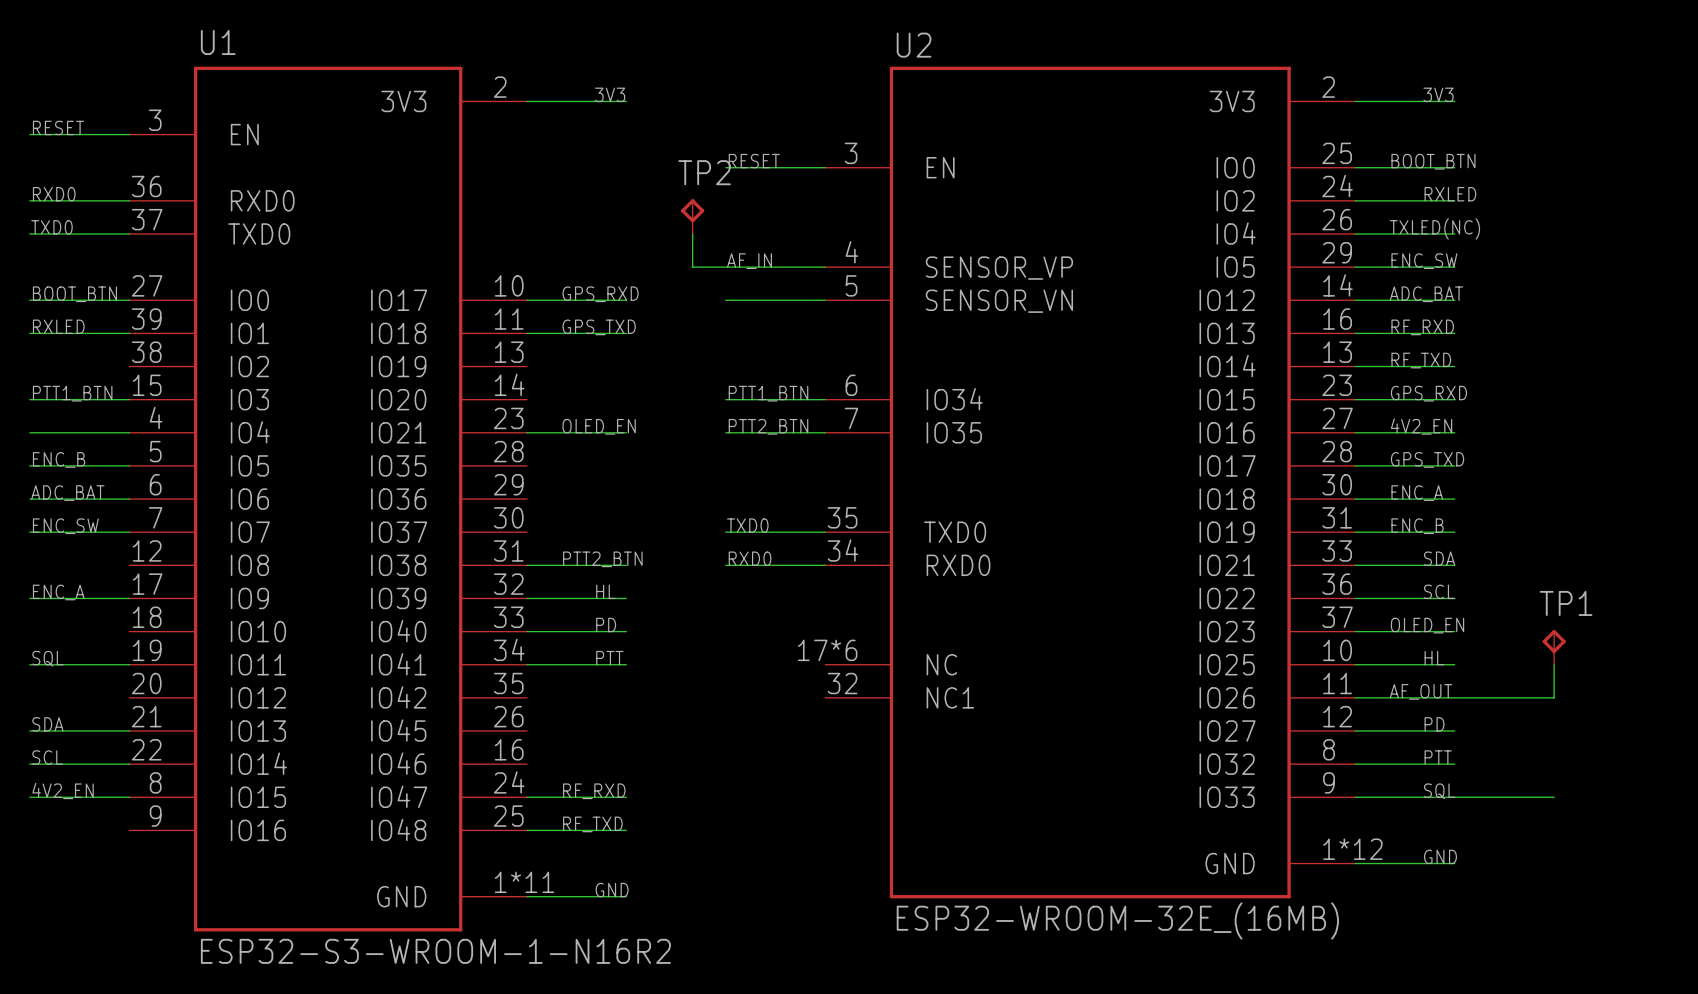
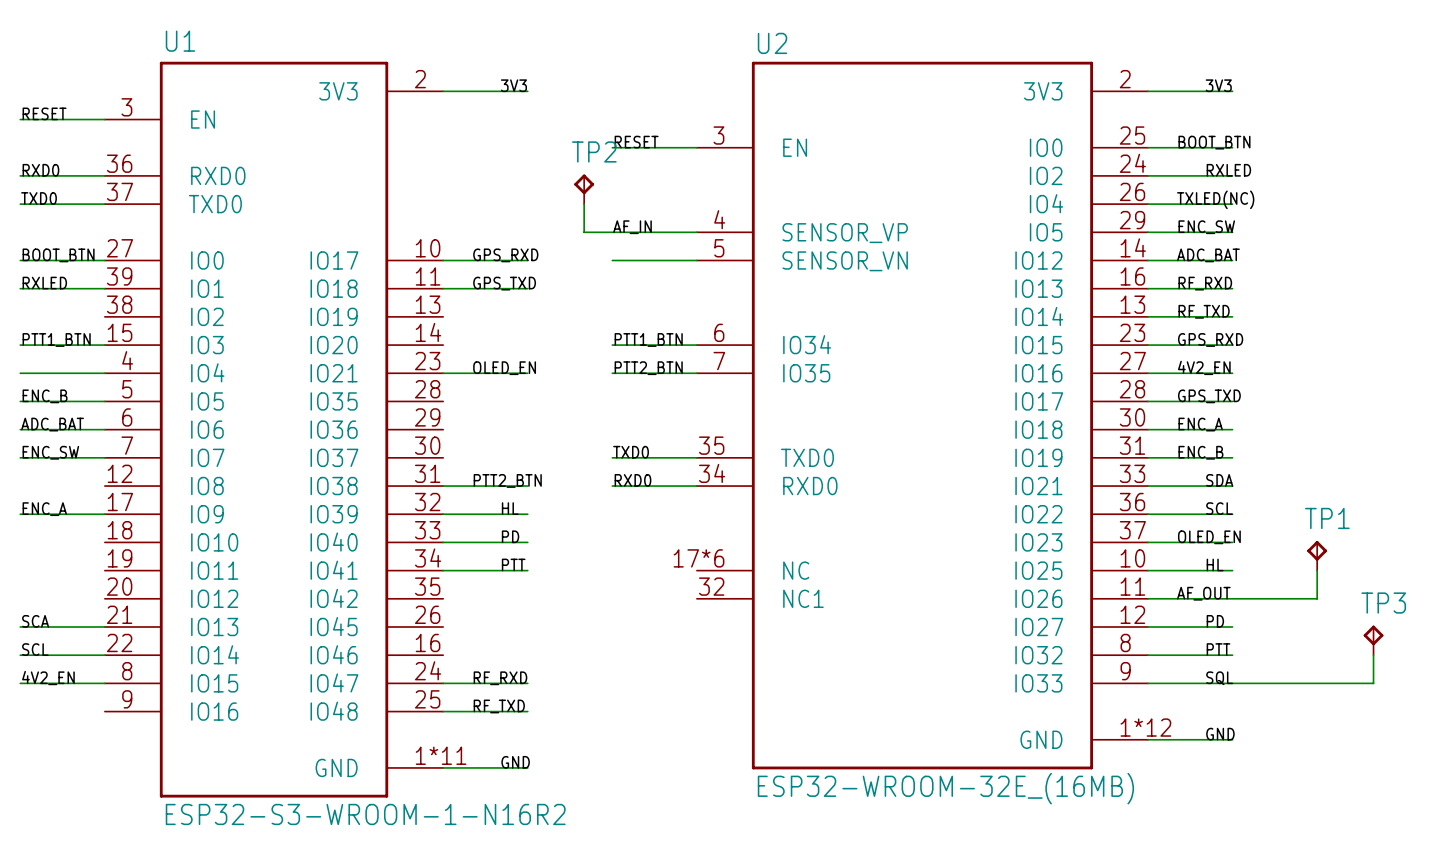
label: SQL (47, 658) -> none
wire: (29, 664) (129, 664) -> none
label: SDA (47, 724) -> SCA (35, 621)
TP3: none -> (1373, 640)
wire: none -> (1373, 655) (1373, 683) (1317, 683)

